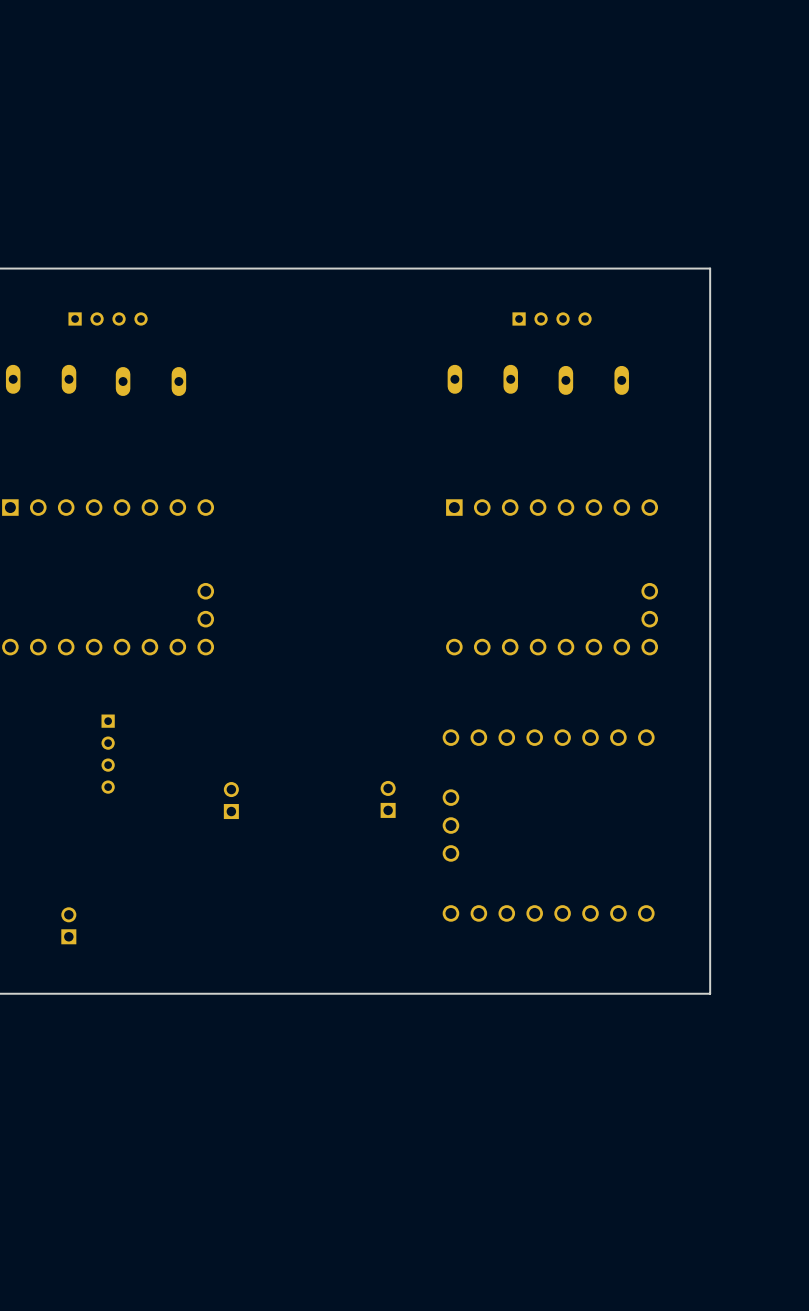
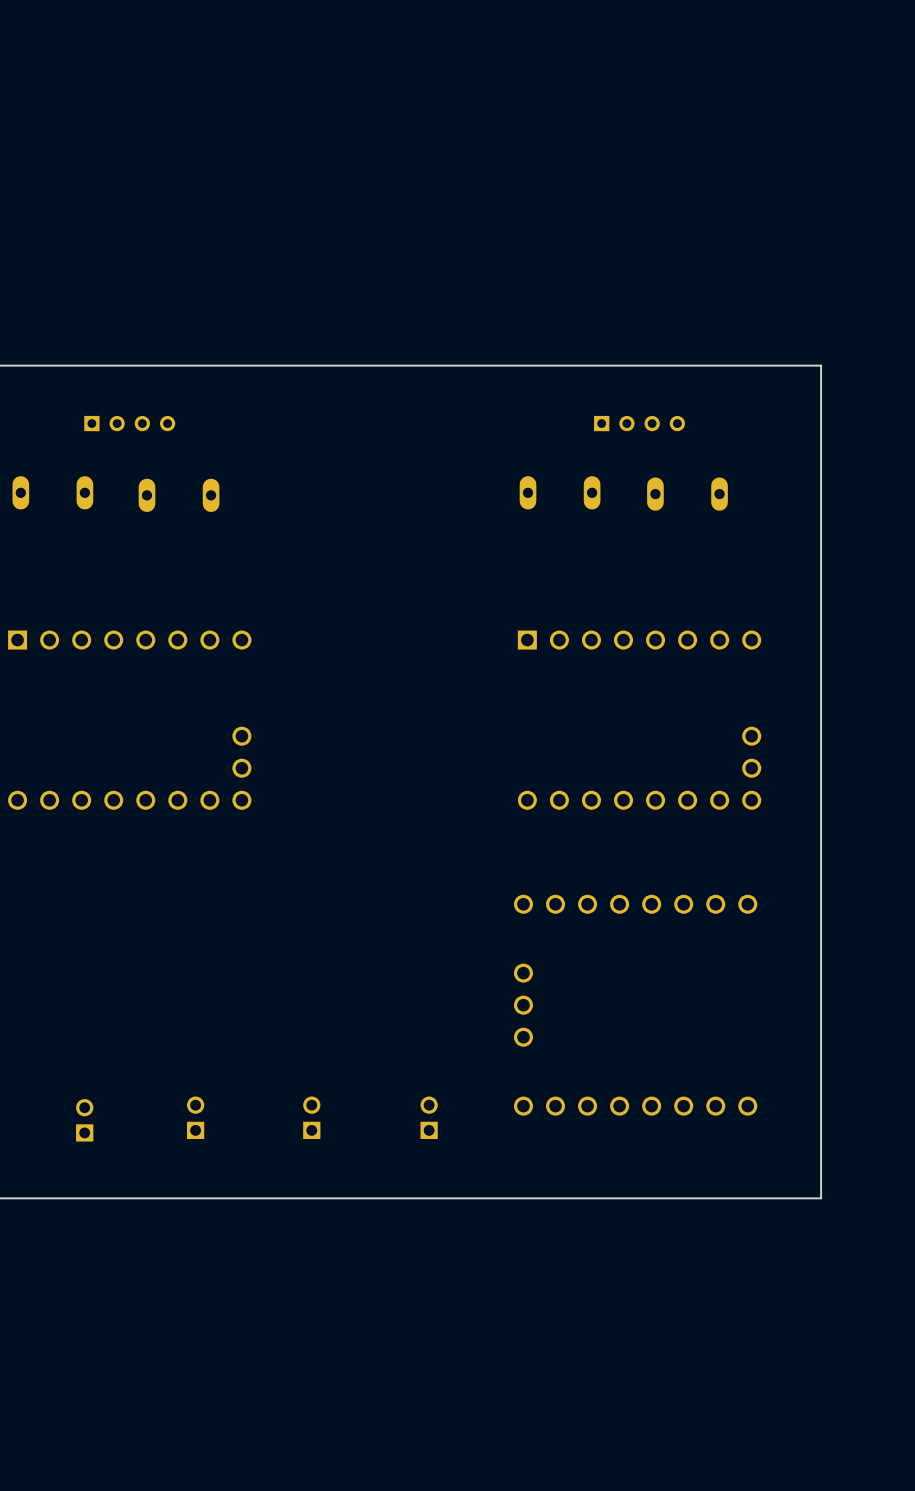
part: (108, 754) -> none
part: (388, 799) -> none
part: (231, 800) -> none
part: none -> (195, 1117)
part: none -> (311, 1117)
part: none -> (429, 1117)

